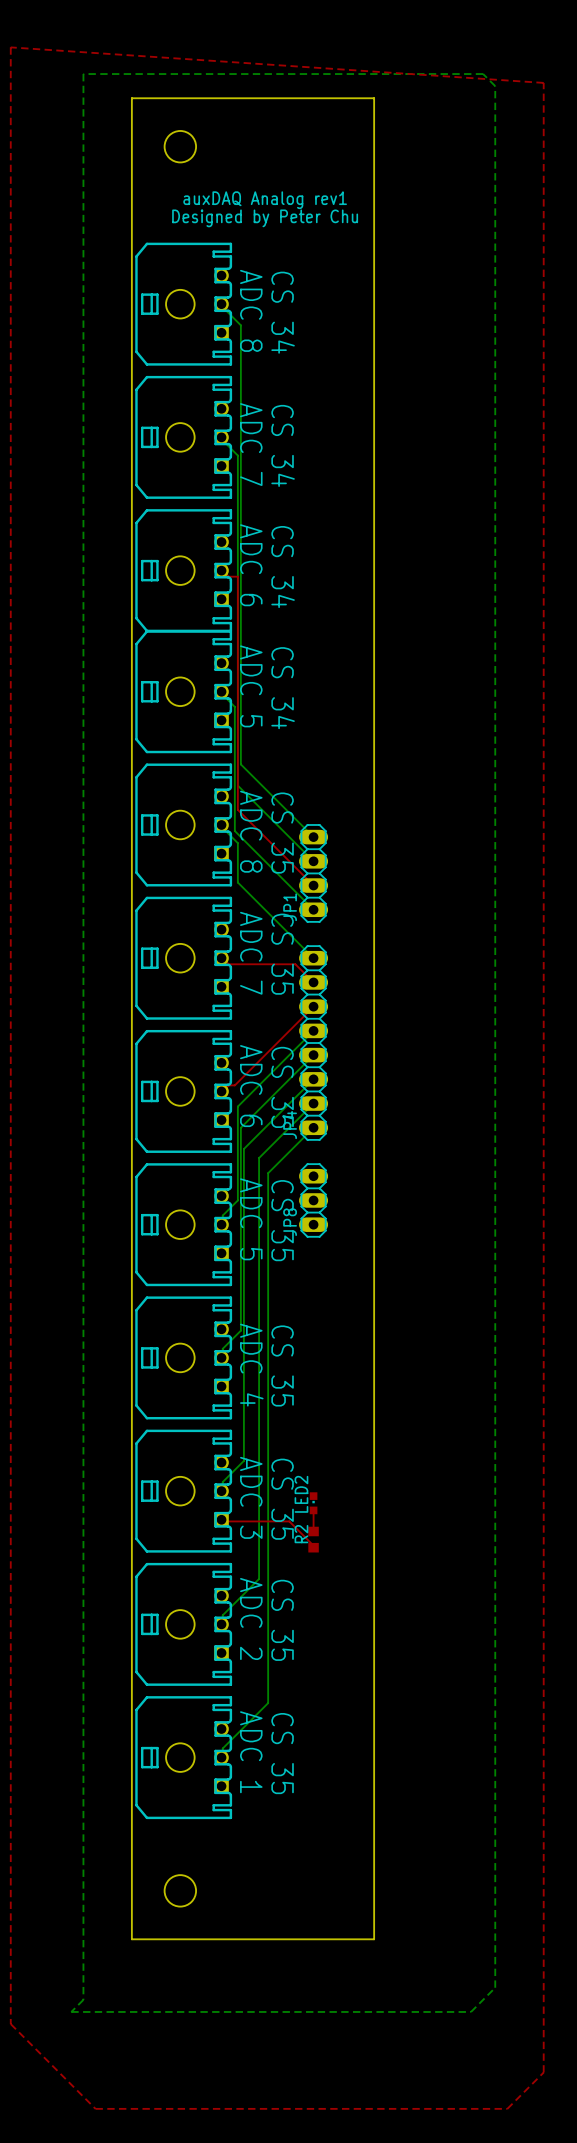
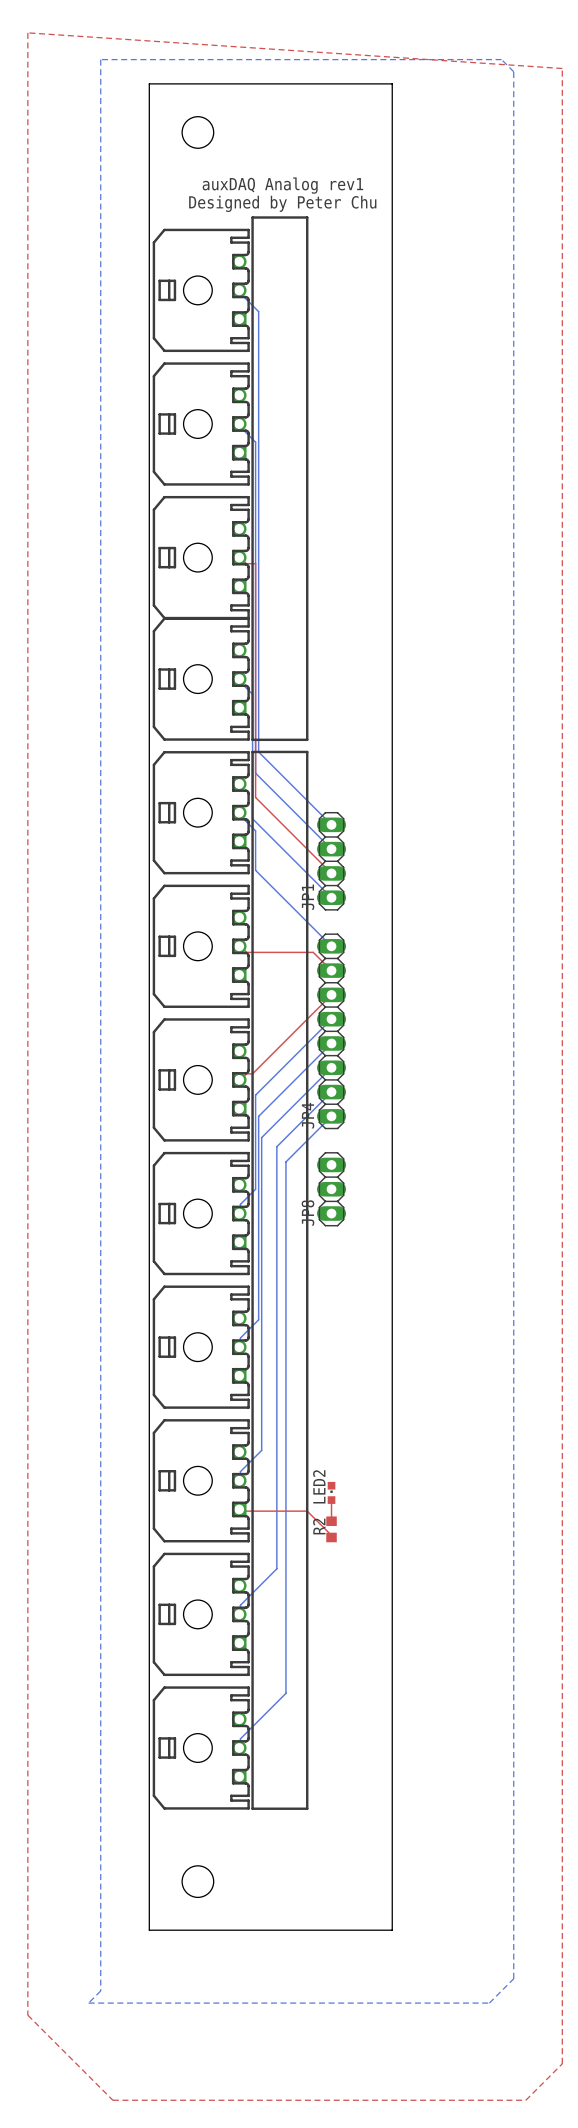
line: none -> (252, 217) (307, 217) (307, 739) (252, 739) (252, 217)
text: ADC 8 (251, 310) -> none
text: CS 34 (283, 312) -> none
text: ADC 7 (251, 444) -> none
text: CS 34 (283, 445) -> none
text: ADC 6 (251, 565) -> none
text: CS 34 (283, 567) -> none
text: ADC 5 (251, 686) -> none
text: CS 34 (283, 688) -> none
line: none -> (252, 751) (252, 1808) (307, 1808) (307, 751) (252, 751)
text: ADC 8 (251, 831) -> none
text: CS 35 (282, 833) -> none
text: ADC 7 (251, 953) -> none
text: CS 35 (282, 954) -> none
text: ADC 6 (251, 1086) -> none
text: CS 35 (282, 1087) -> none
text: ADC 5 (251, 1219) -> none
text: CS 35 (282, 1220) -> none
text: ADC 4 (251, 1365) -> none
text: CS 35 (282, 1365) -> none
text: ADC 3 (251, 1497) -> none
text: CS 35 (282, 1499) -> none
text: ADC 2 (251, 1619) -> none
text: CS 35 (282, 1620) -> none
text: ADC 1 (251, 1752) -> none
text: CS 35 (282, 1753) -> none

